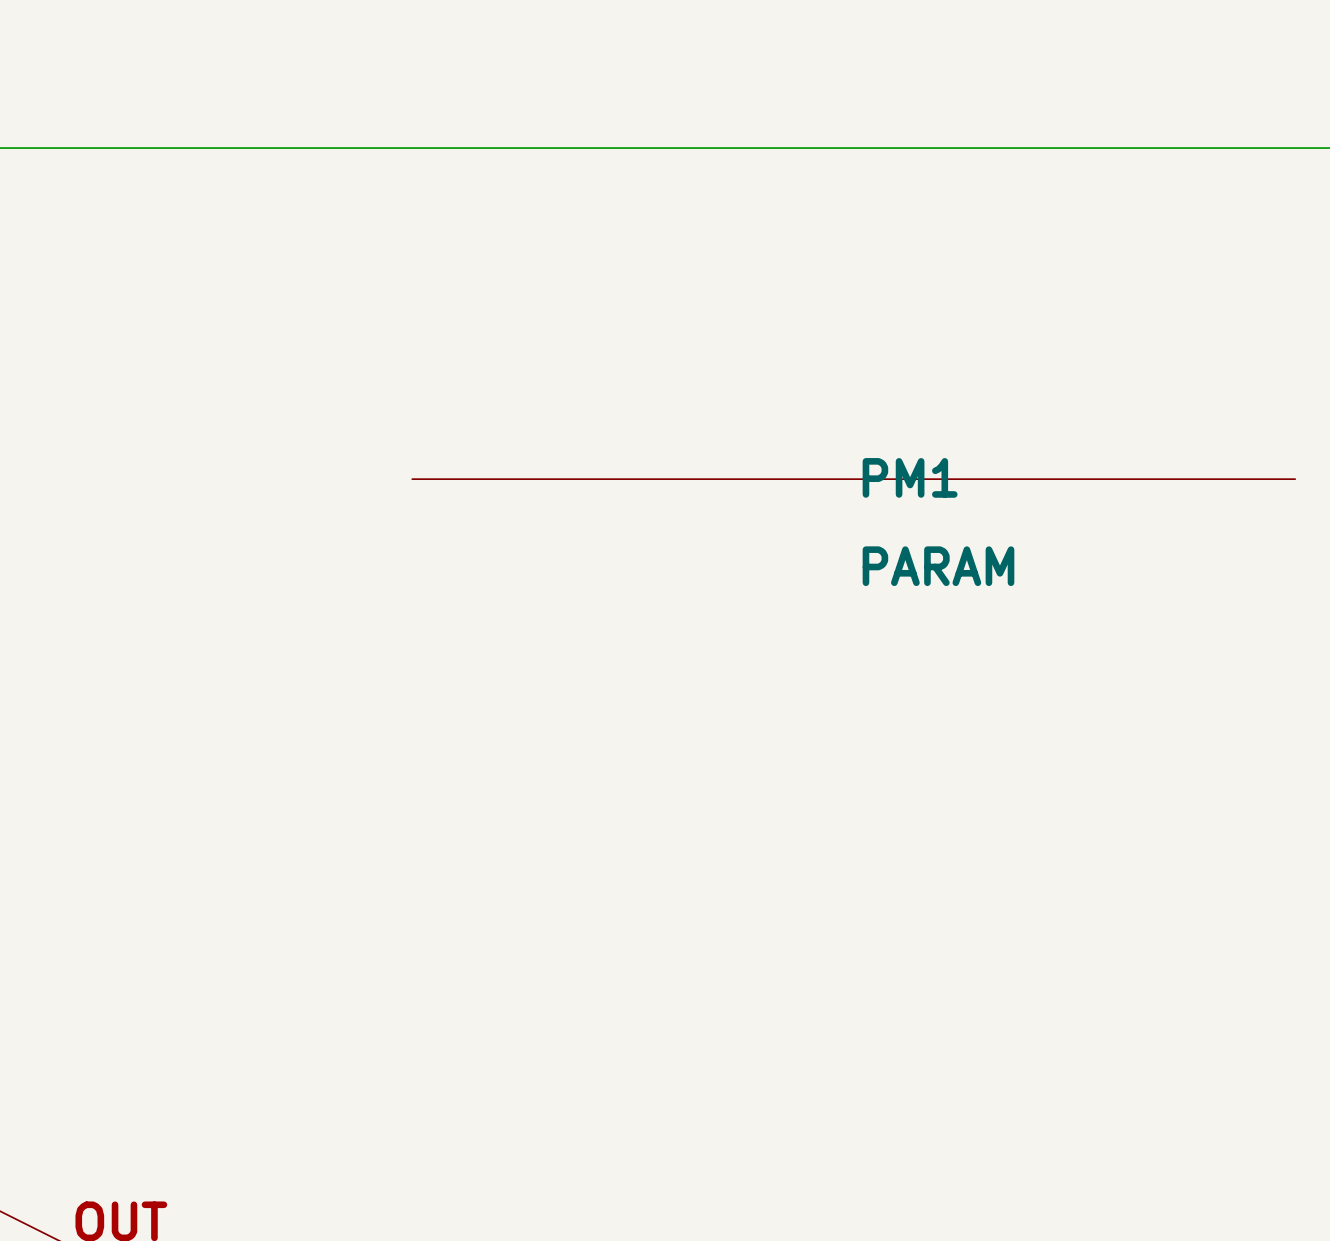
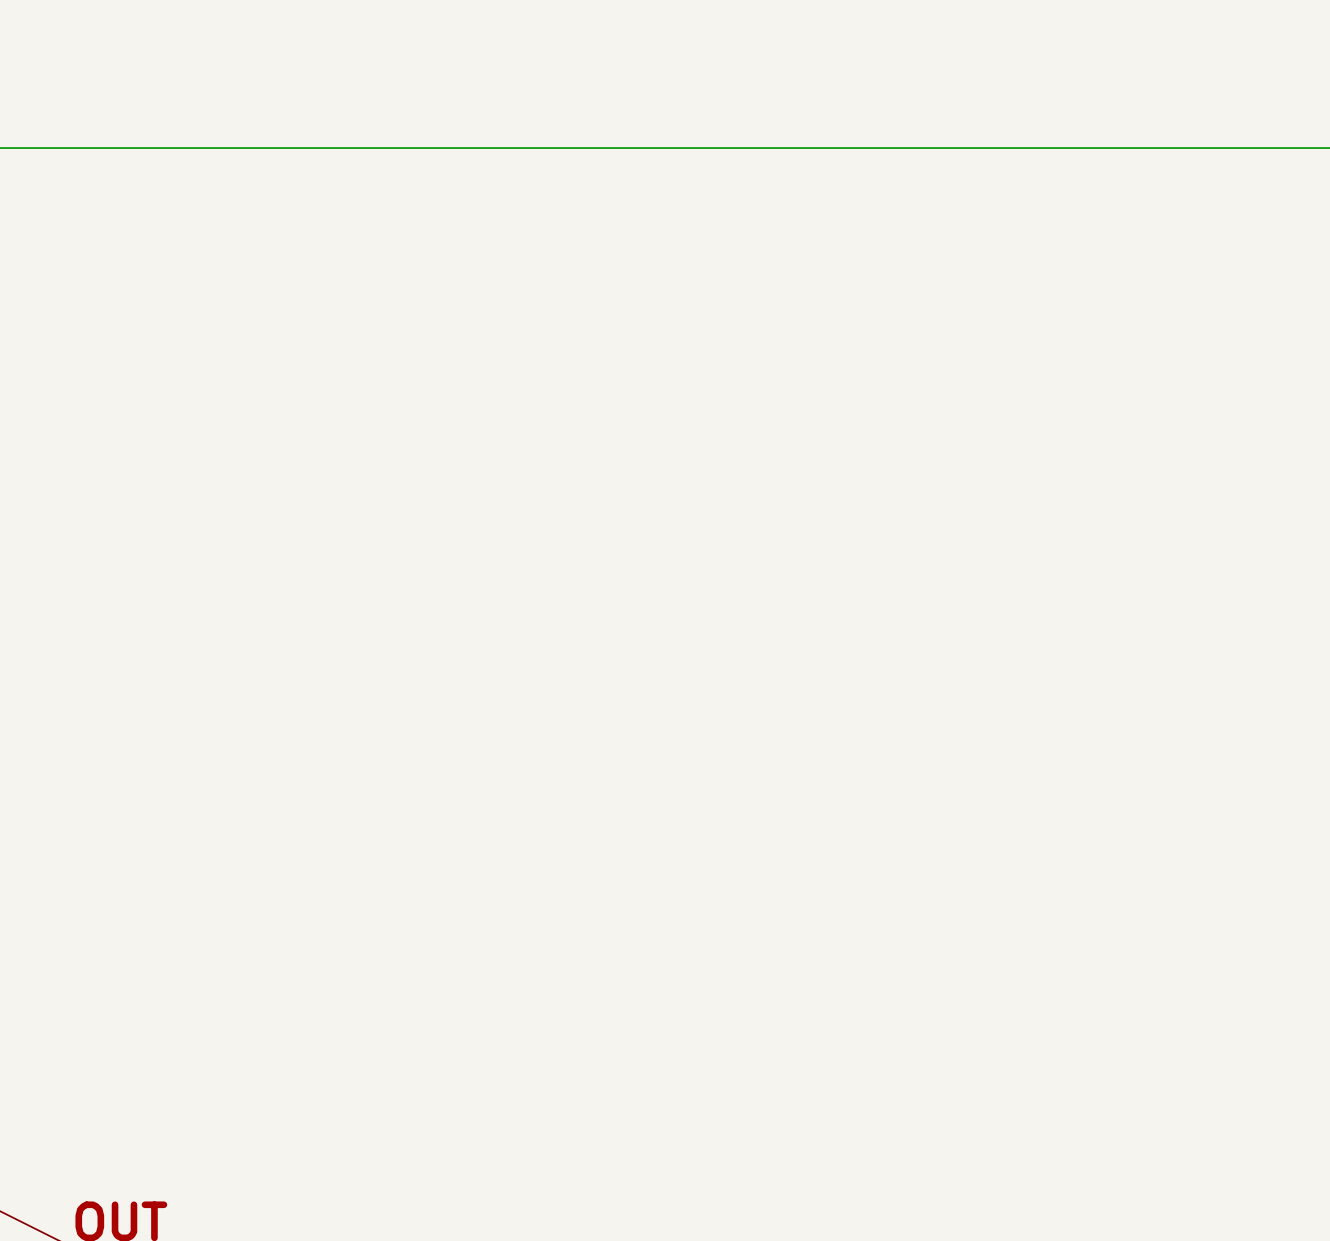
PM1: PARAM (853, 479) -> none

